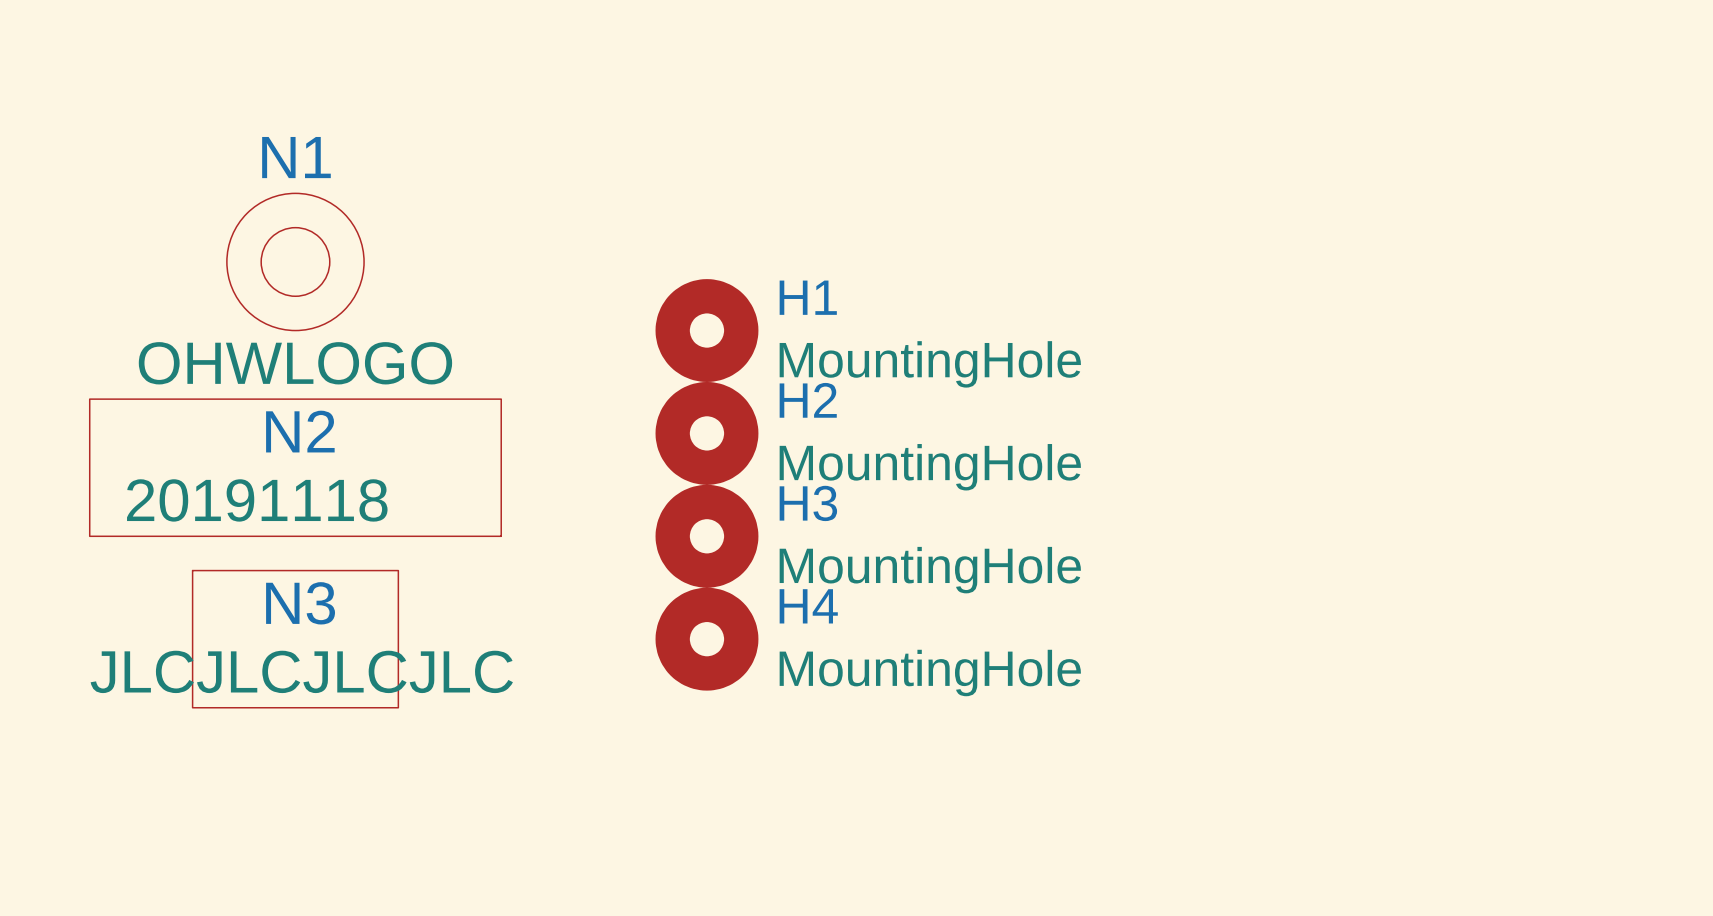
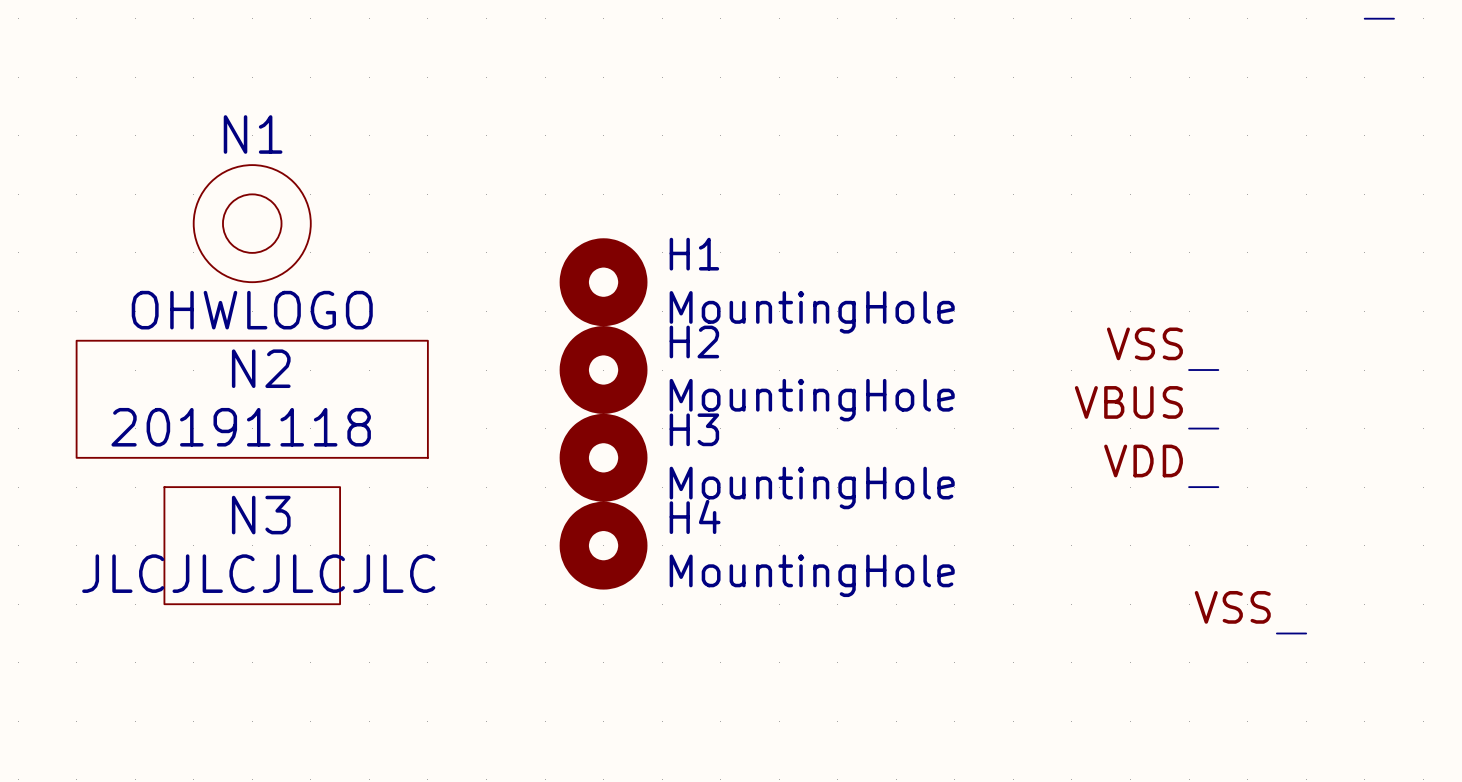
wire: none -> (1364, 18) (1393, 18)
label: none -> VSS (1144, 343)
wire: none -> (1189, 370) (1218, 370)
label: none -> VBUS (1128, 402)
wire: none -> (1189, 428) (1218, 428)
label: none -> VDD (1143, 460)
wire: none -> (1189, 487) (1218, 487)
label: none -> VSS (1232, 607)
wire: none -> (1276, 633) (1306, 633)

